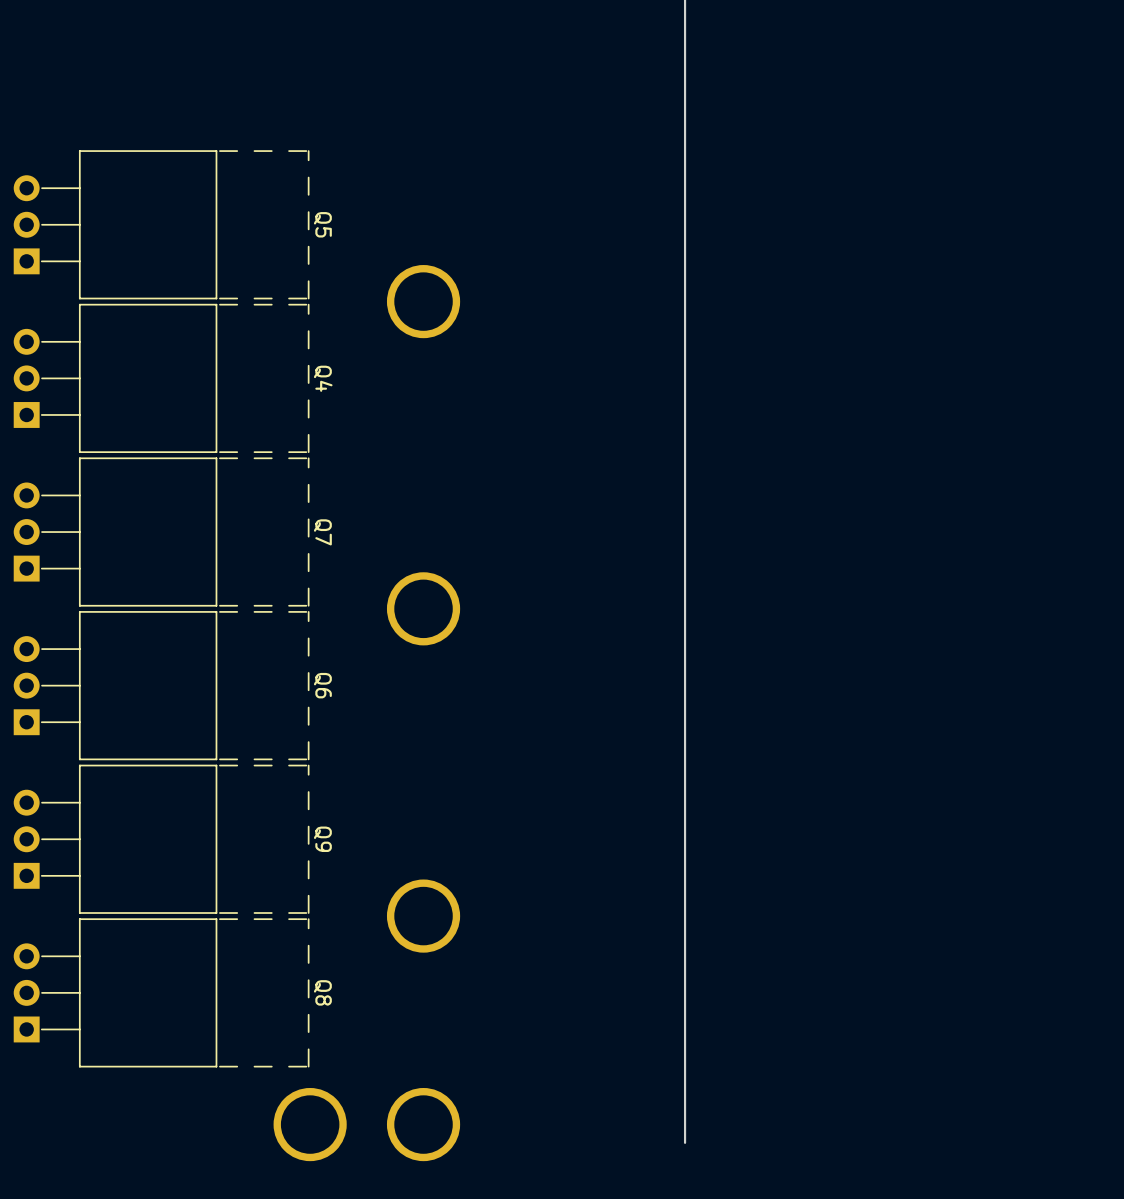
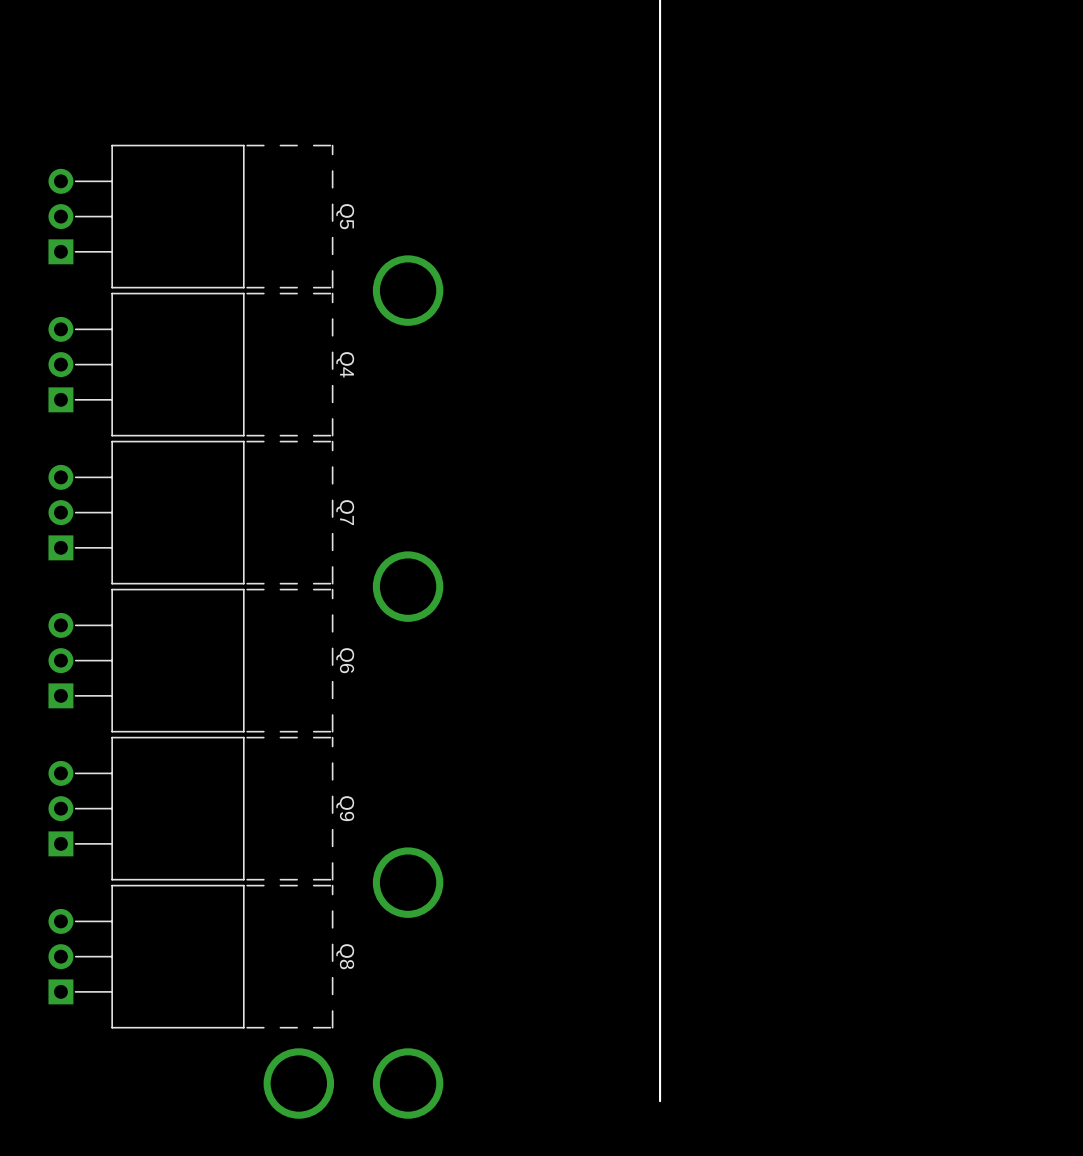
Q5 position: (161, 224) -> (190, 216)
Q4 position: (161, 378) -> (190, 364)
Q7 position: (161, 532) -> (190, 512)
Q6 position: (161, 685) -> (190, 660)
Q9 position: (161, 839) -> (190, 808)
Q8 position: (161, 992) -> (190, 956)

